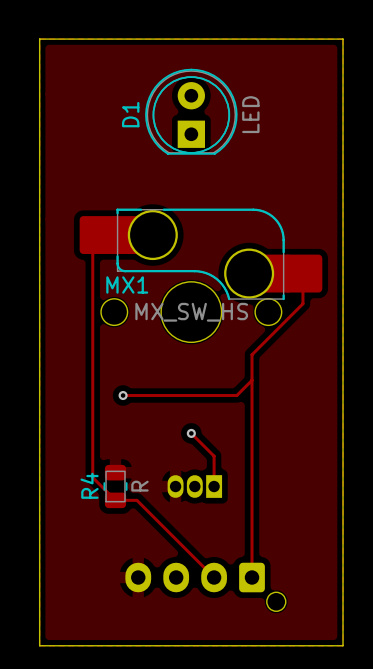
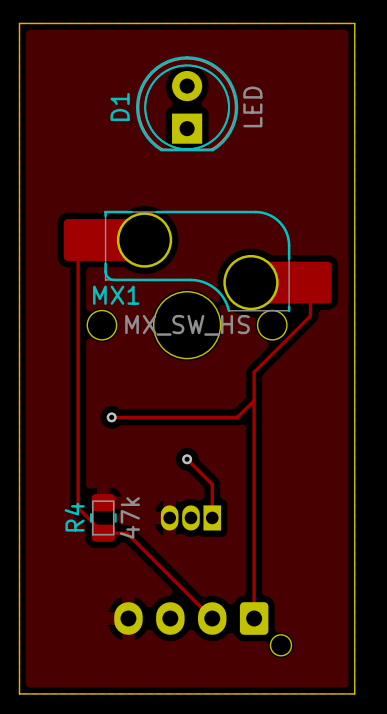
R4 value: R (139, 486) -> 47k (129, 517)

